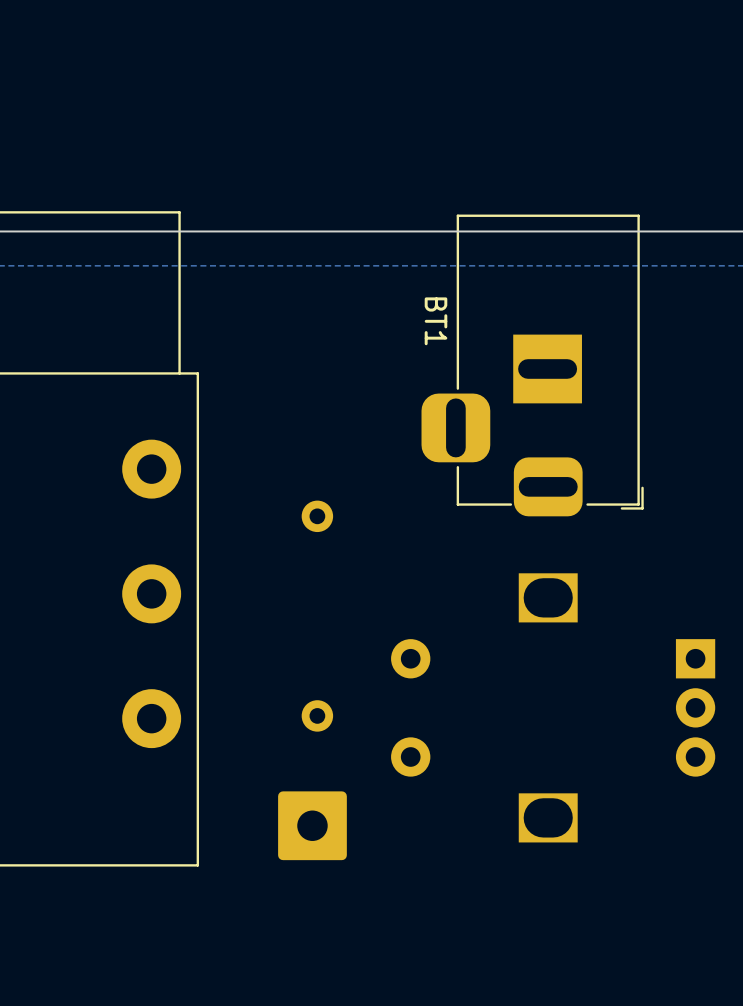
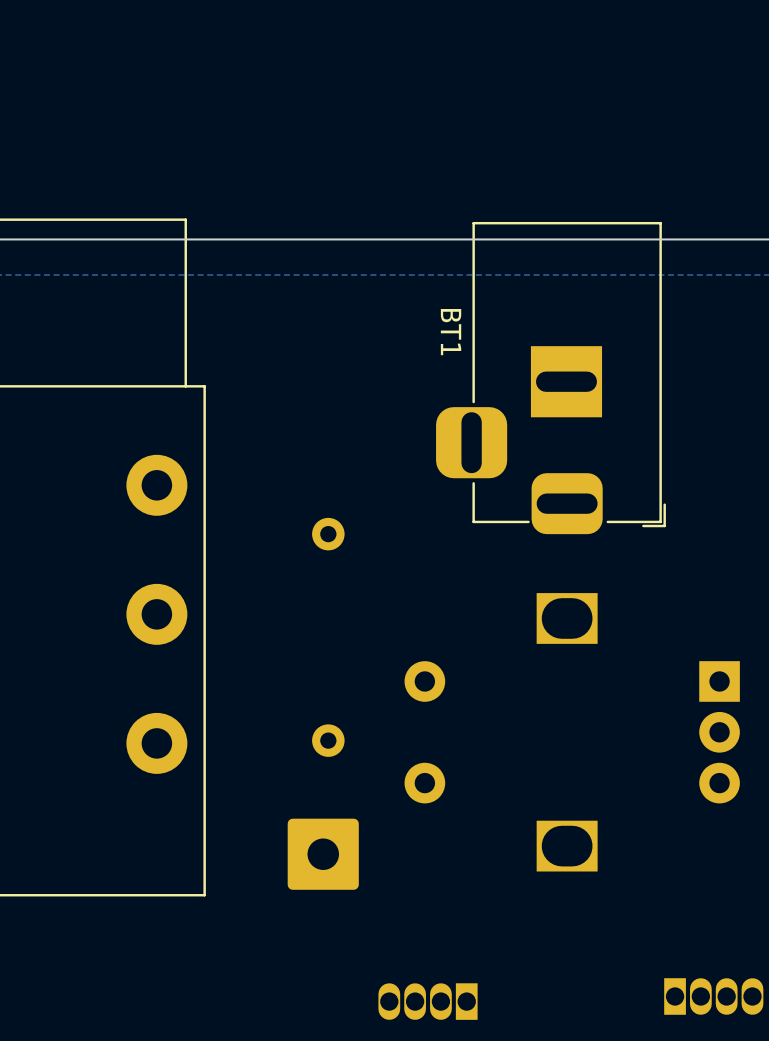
part: none -> (713, 996)
part: none -> (428, 1001)

